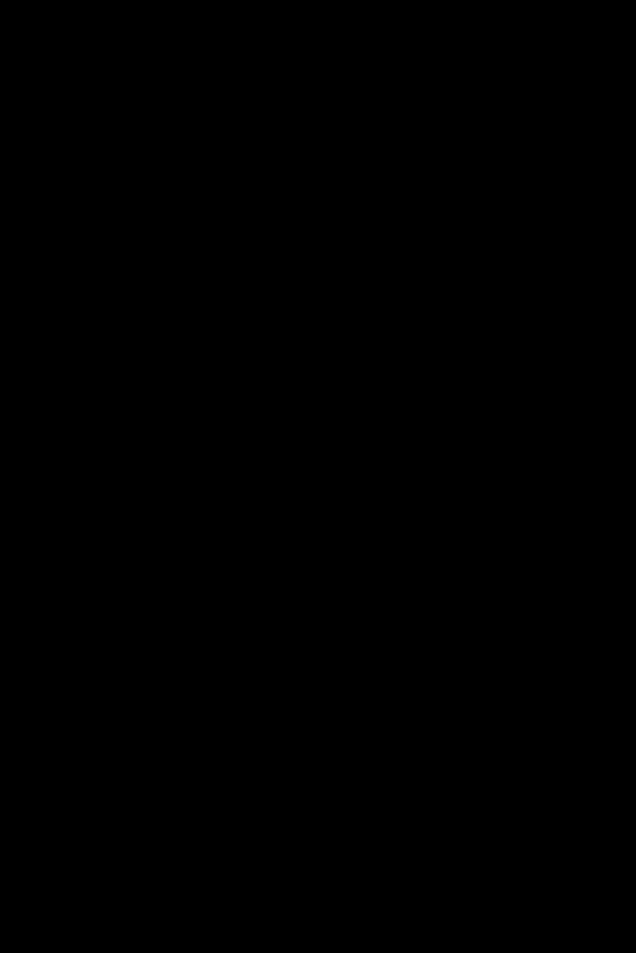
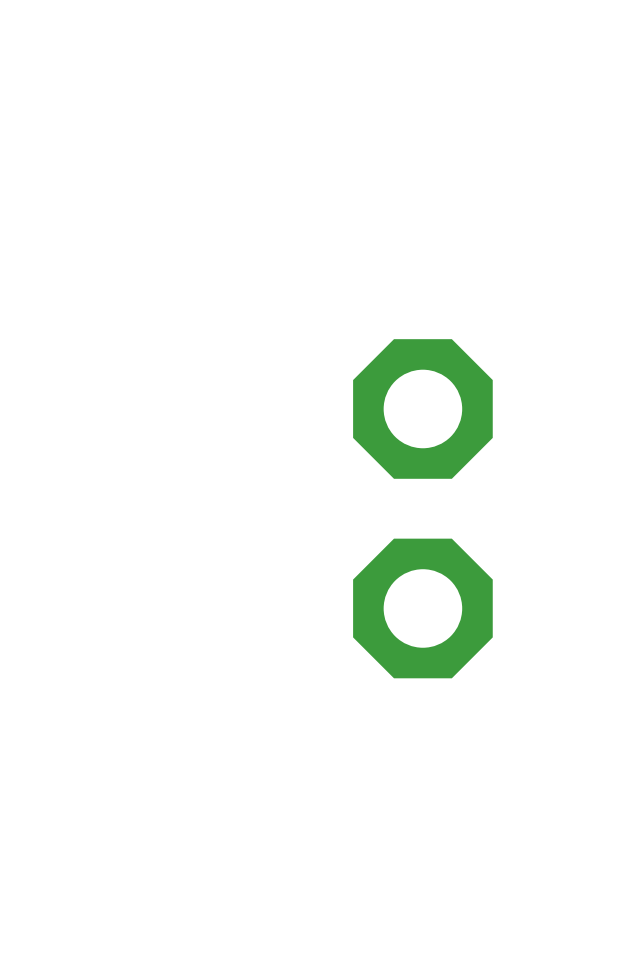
part: none -> (422, 508)

